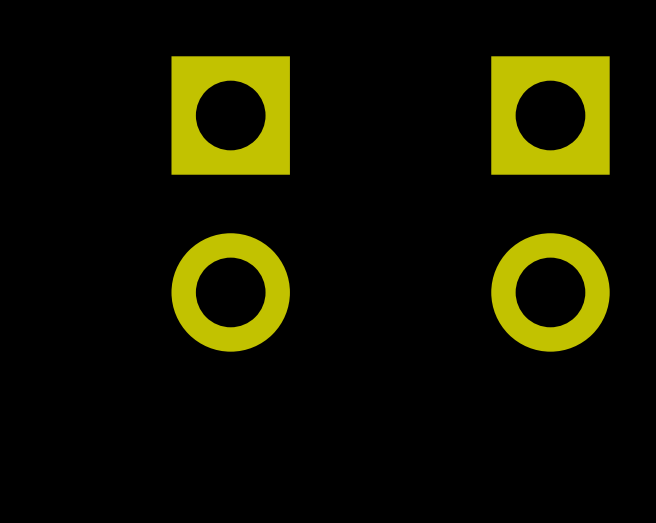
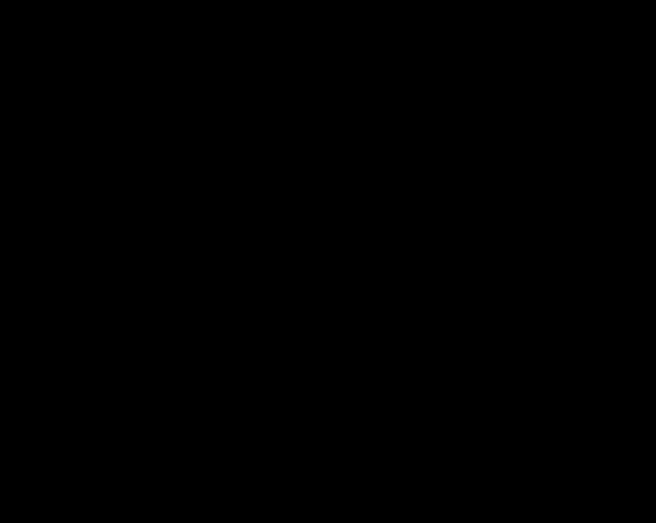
part: (230, 203) -> none
part: (550, 203) -> none

